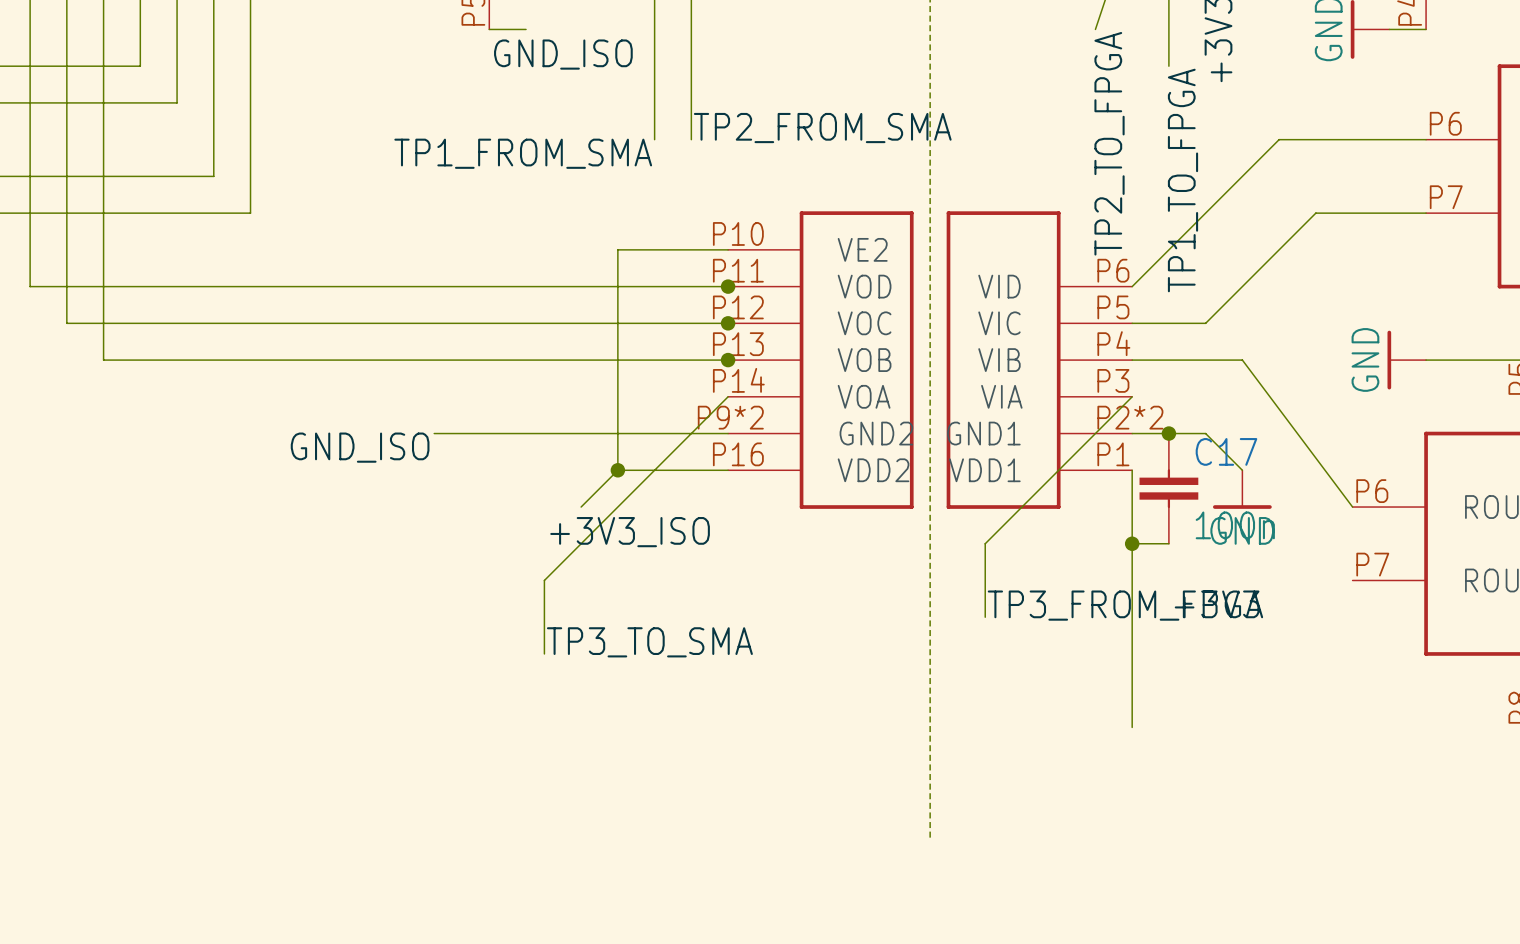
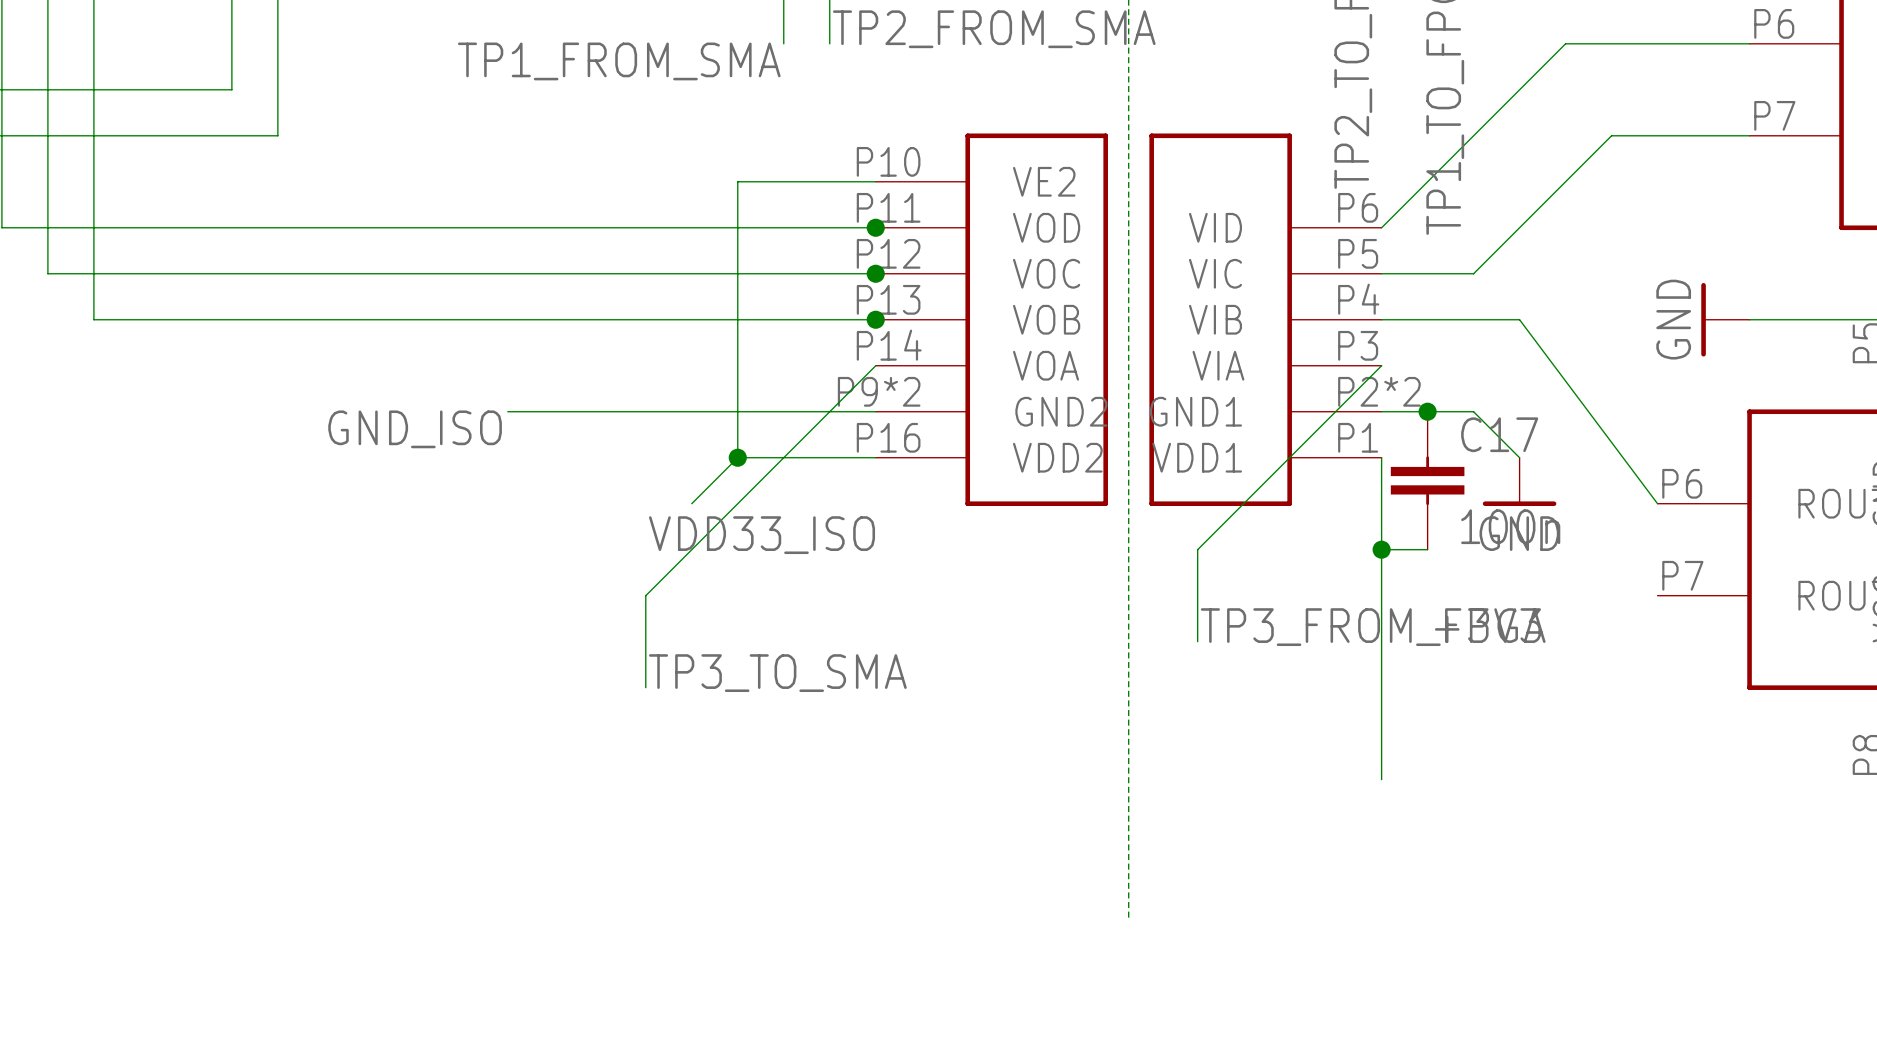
label: +3V3_ISO (630, 532) -> VDD33_ISO (762, 535)

